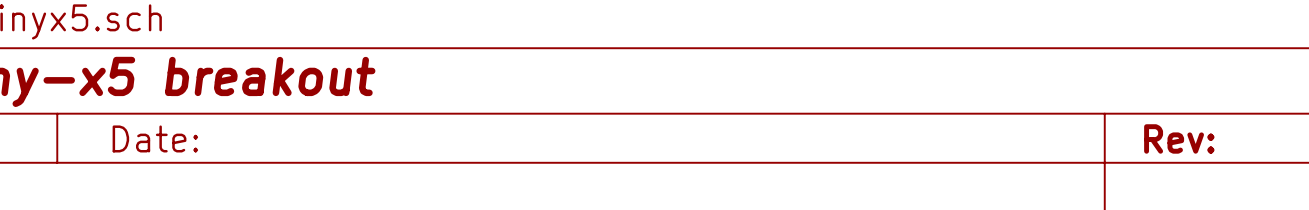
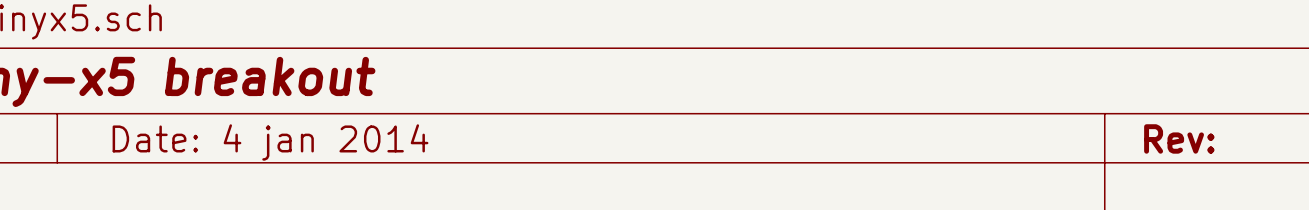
title block: Date: (155, 138) -> Date: 4 jan 2014 (270, 142)

